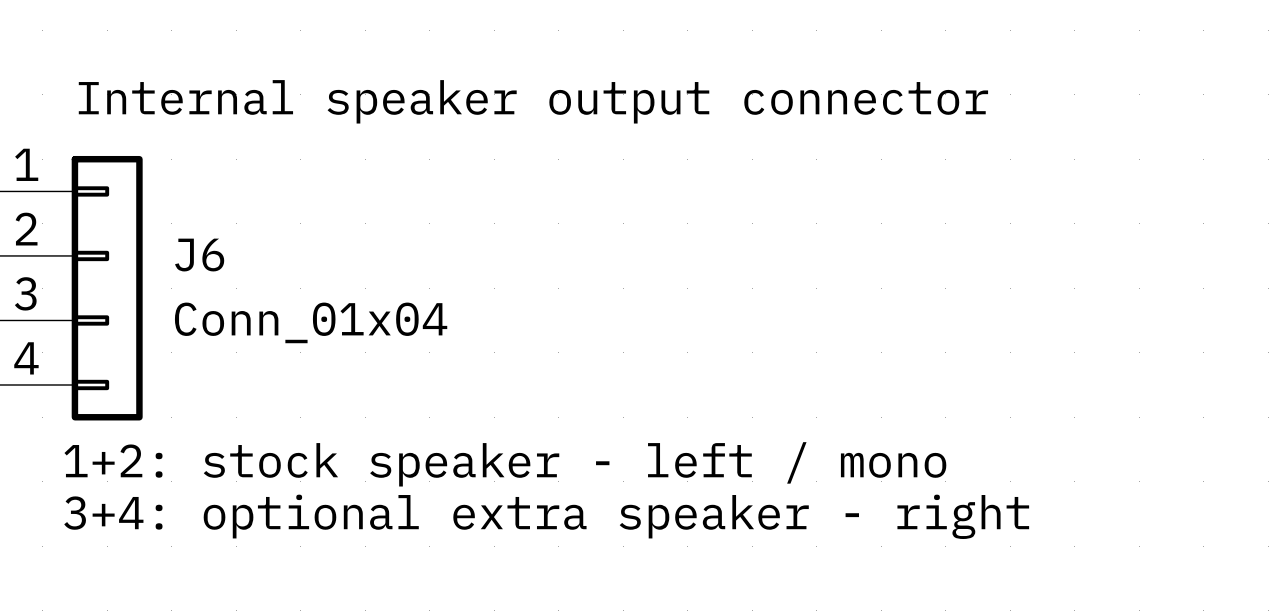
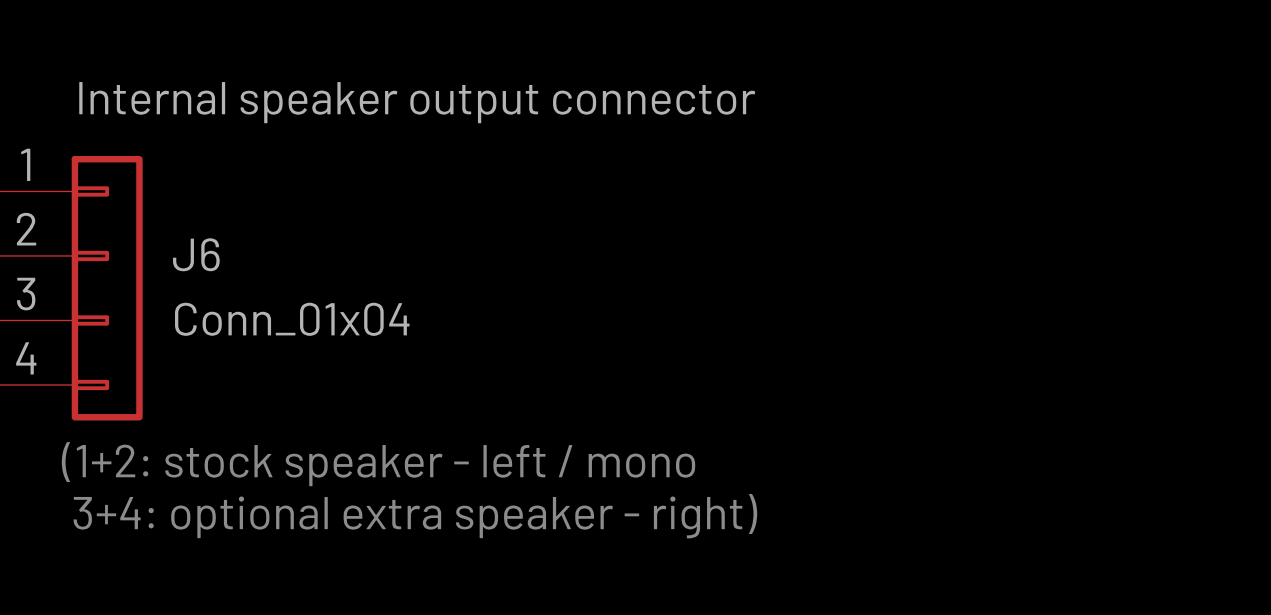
text: 1+2: stock speaker - left / mono (505, 464) -> (1+2: stock speaker - left / mono (378, 464)
text: 3+4: optional extra speaker - right (546, 516) -> 3+4: optional extra speaker - right) (415, 516)

